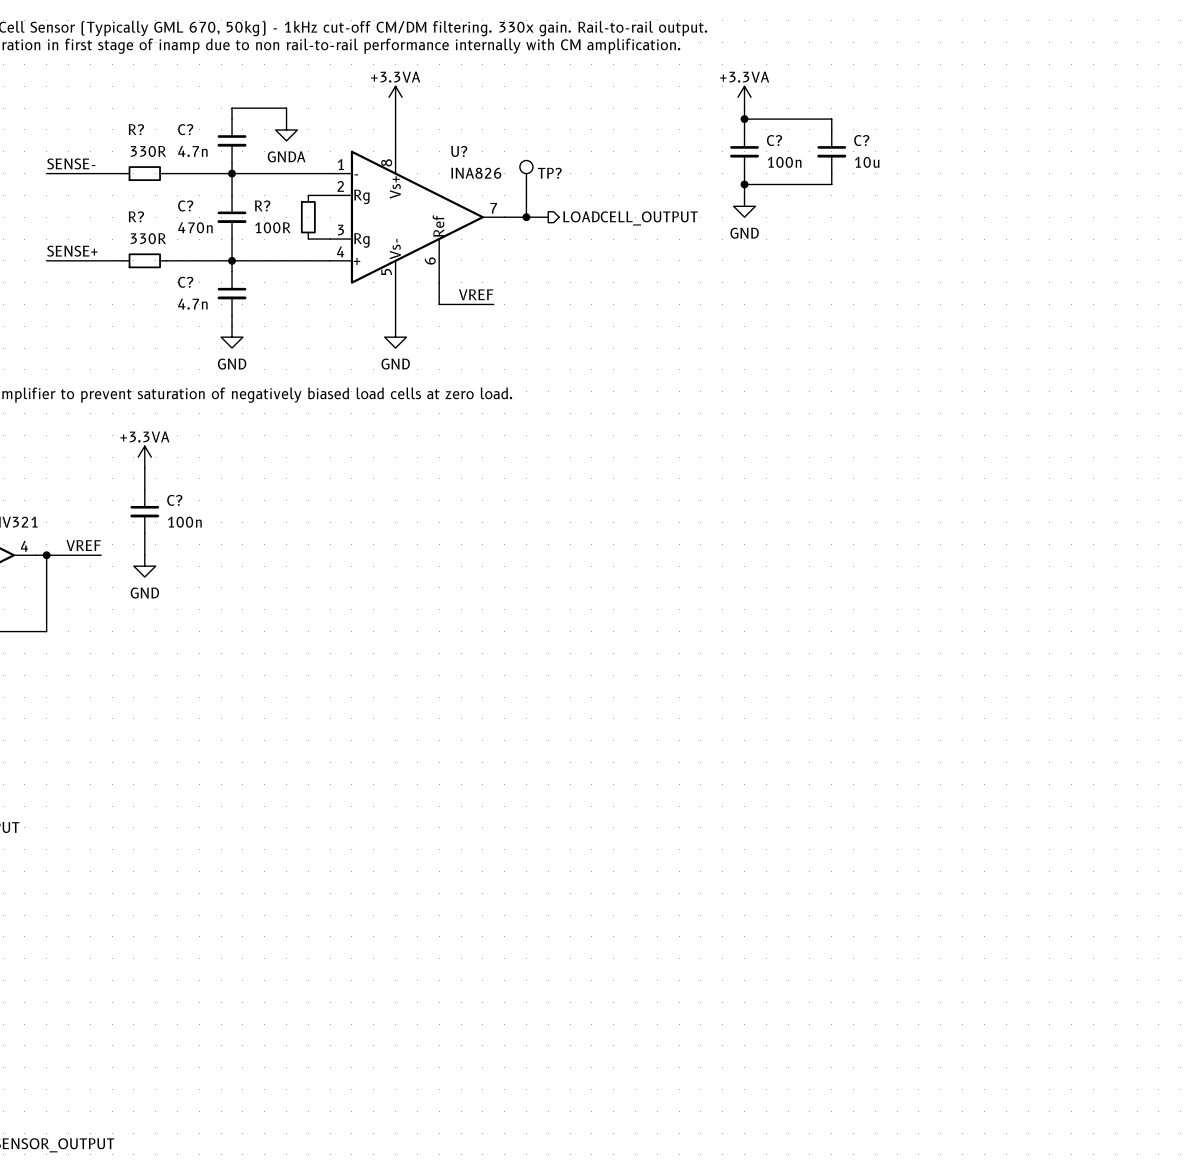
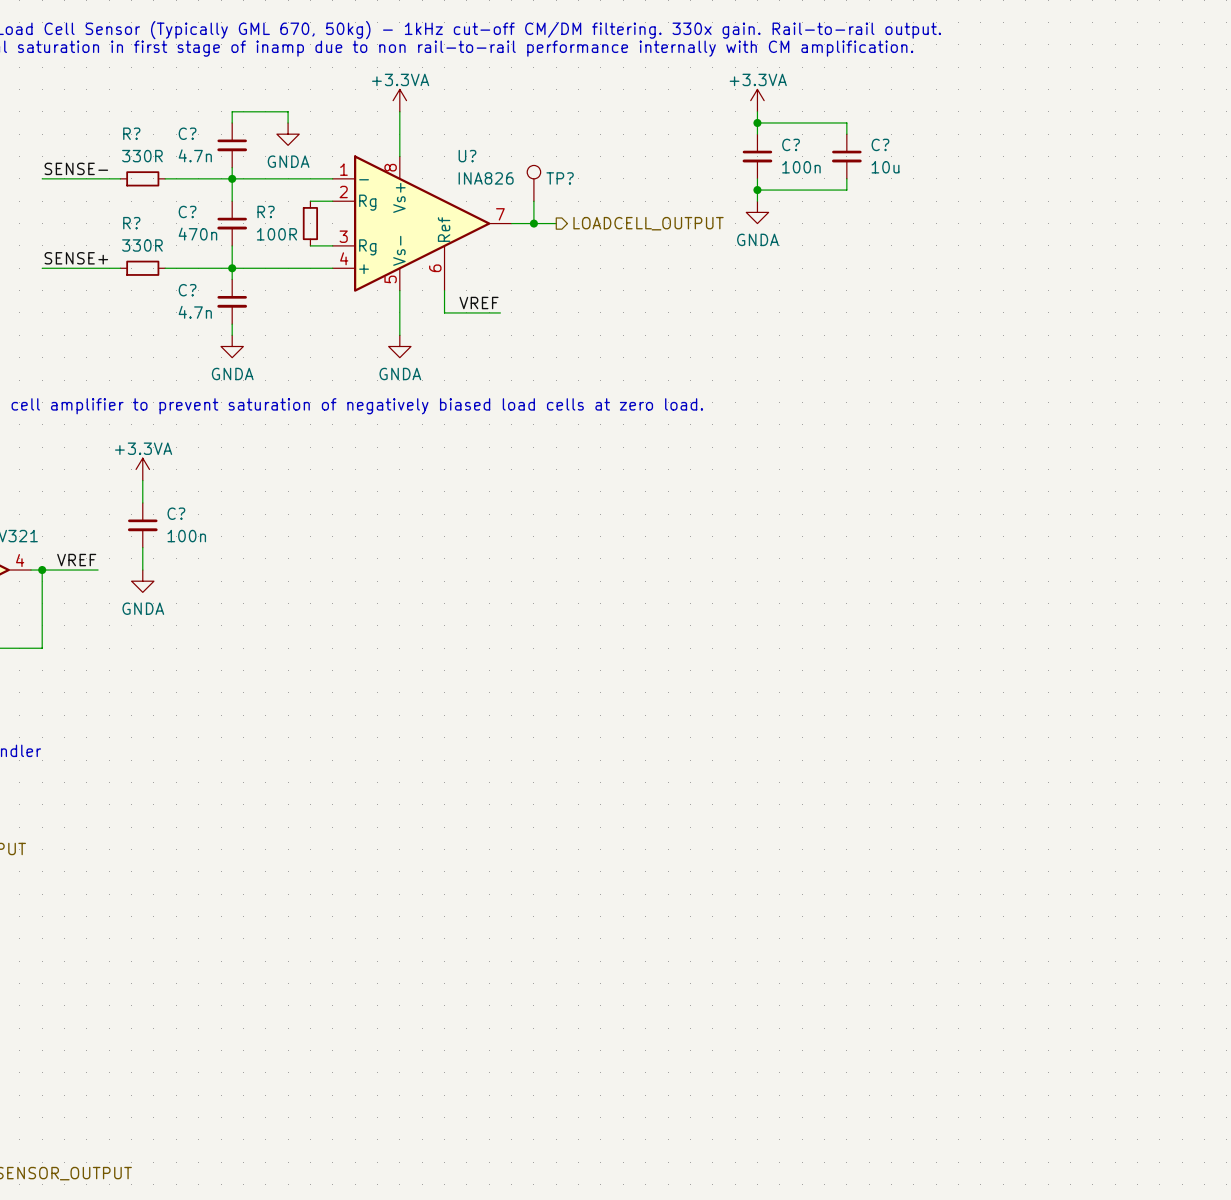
power symbol: GND (744, 206) -> GNDA (757, 212)
power symbol: GND (232, 337) -> GNDA (232, 346)
power symbol: GND (395, 337) -> GNDA (399, 346)
power symbol: GND (144, 566) -> GNDA (142, 581)

